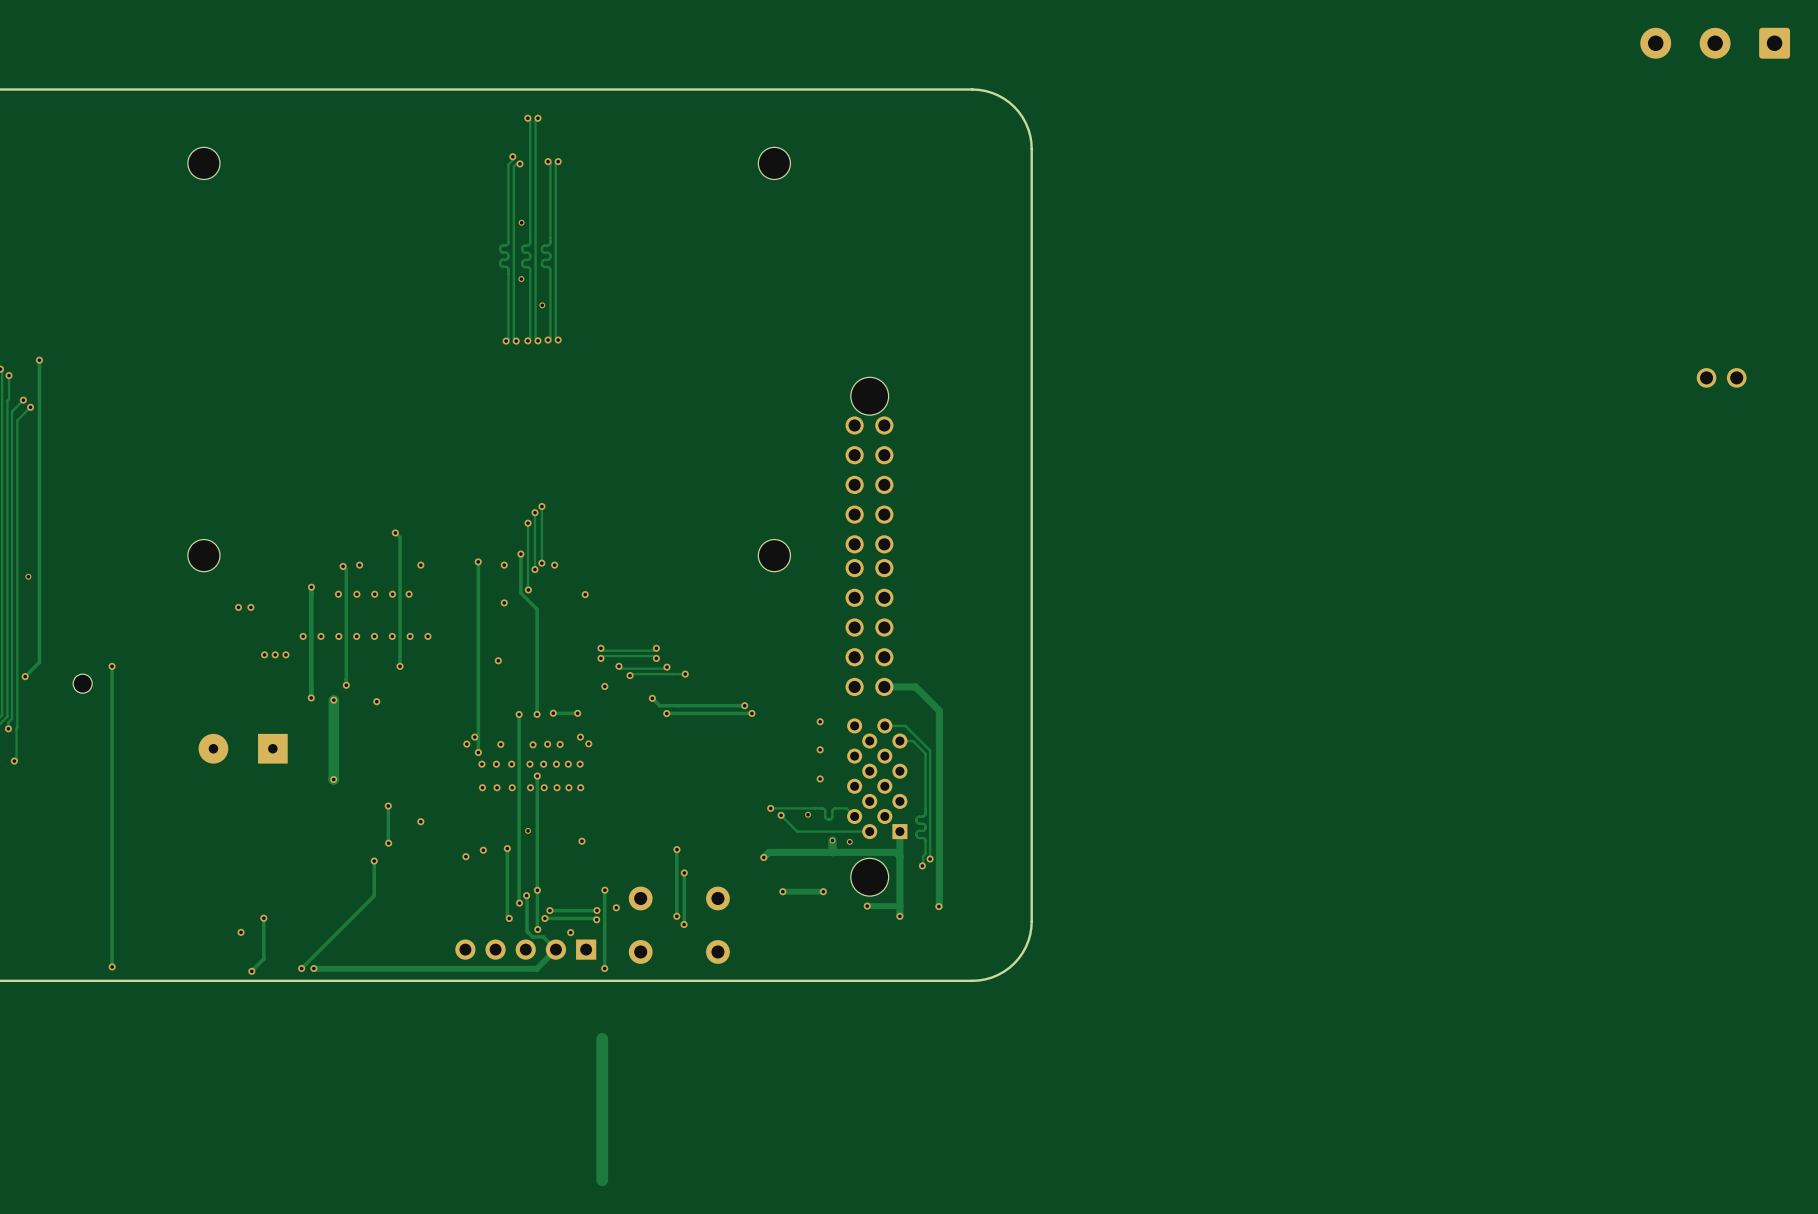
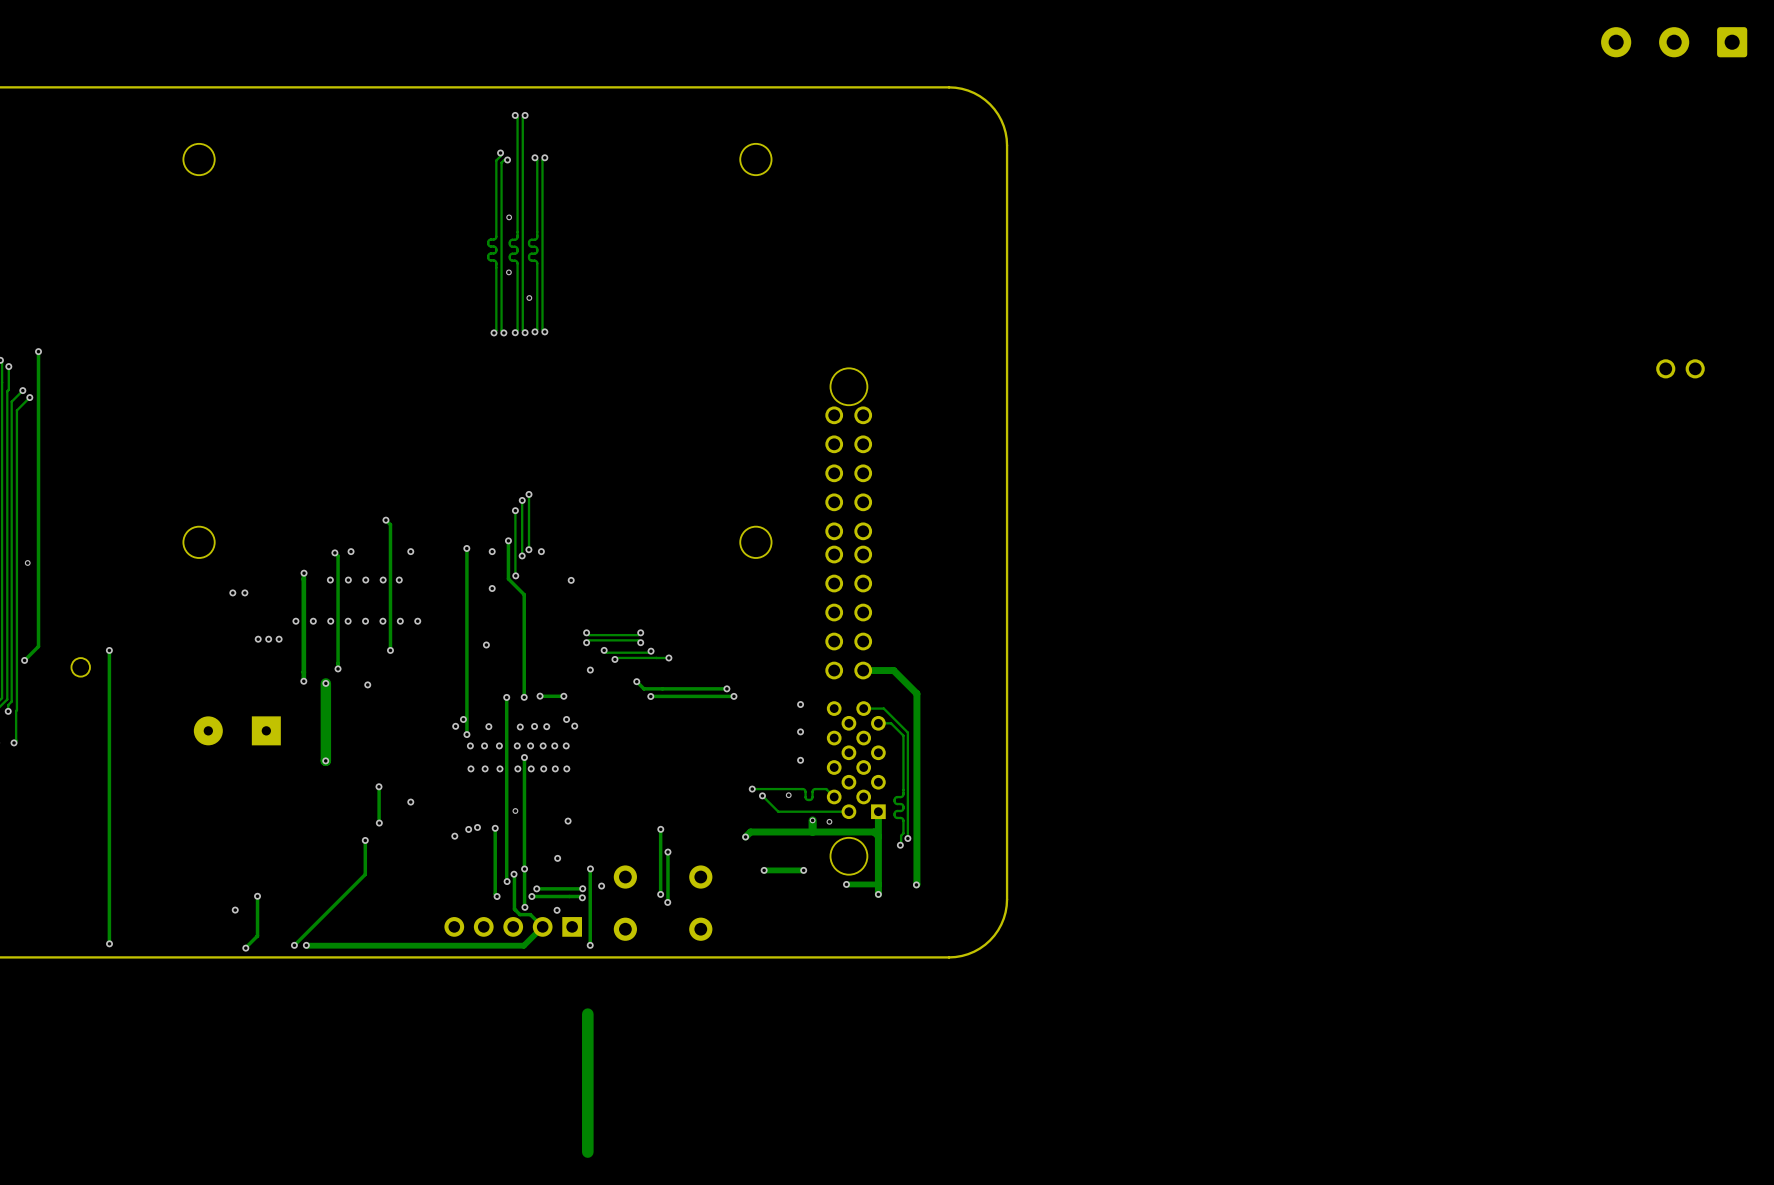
via: none -> (477, 827)
via: none -> (468, 829)
via: (483, 850) -> none
via: none -> (557, 858)

